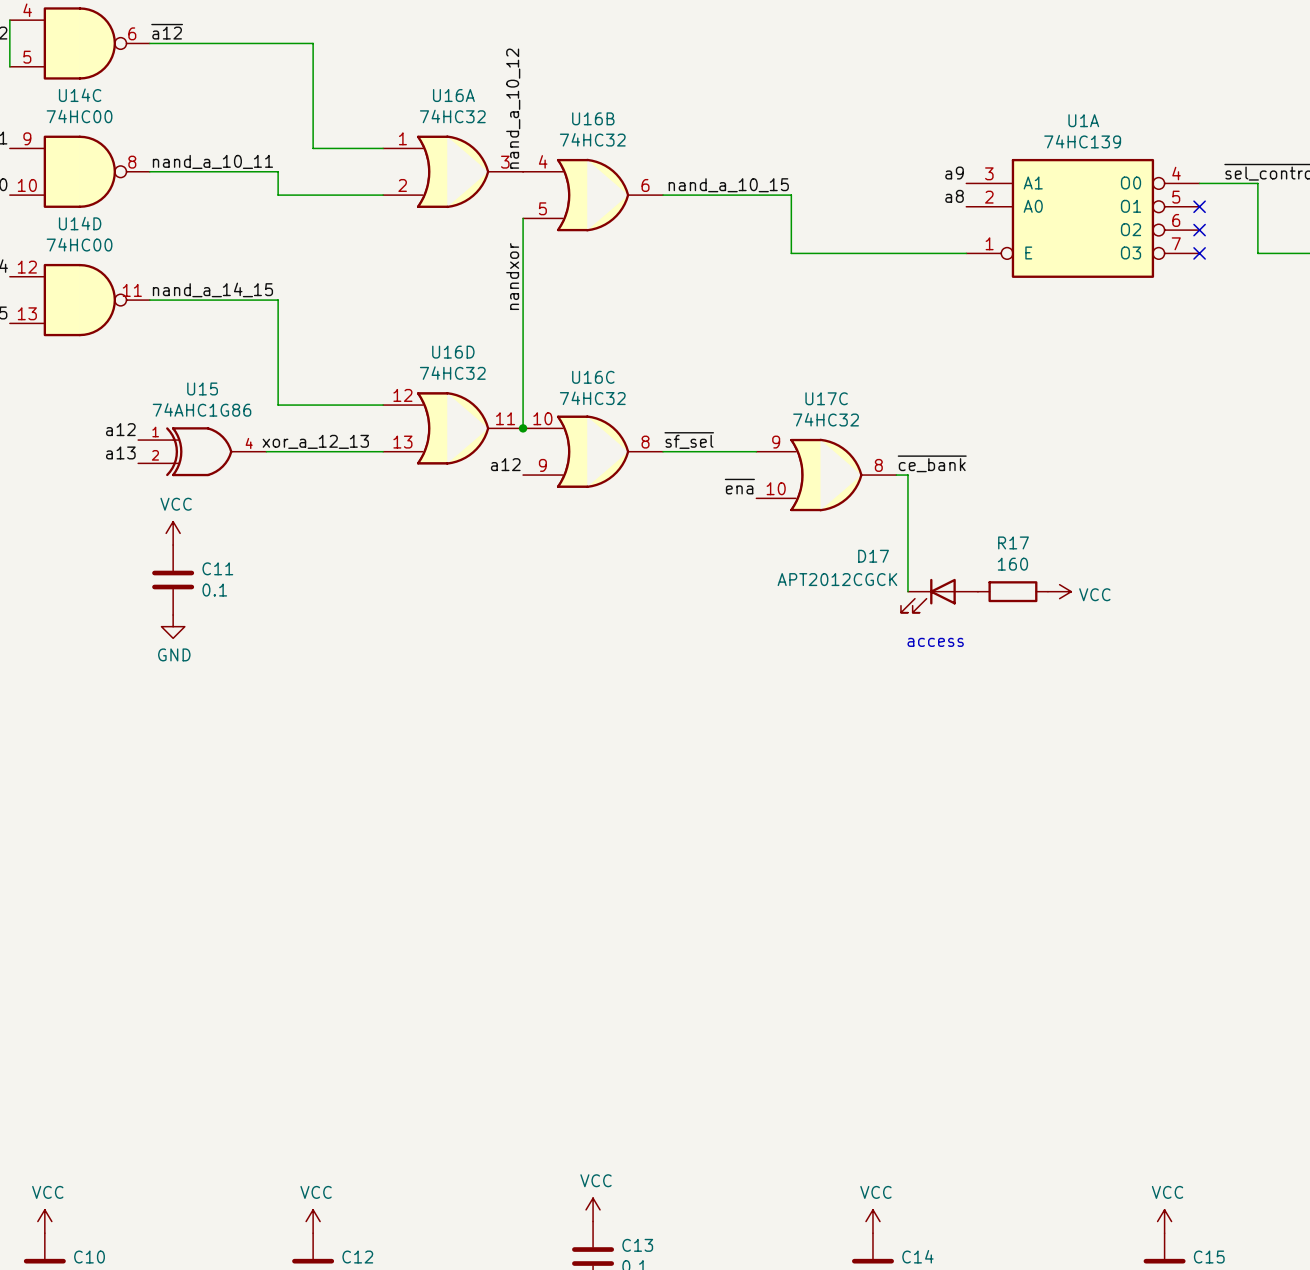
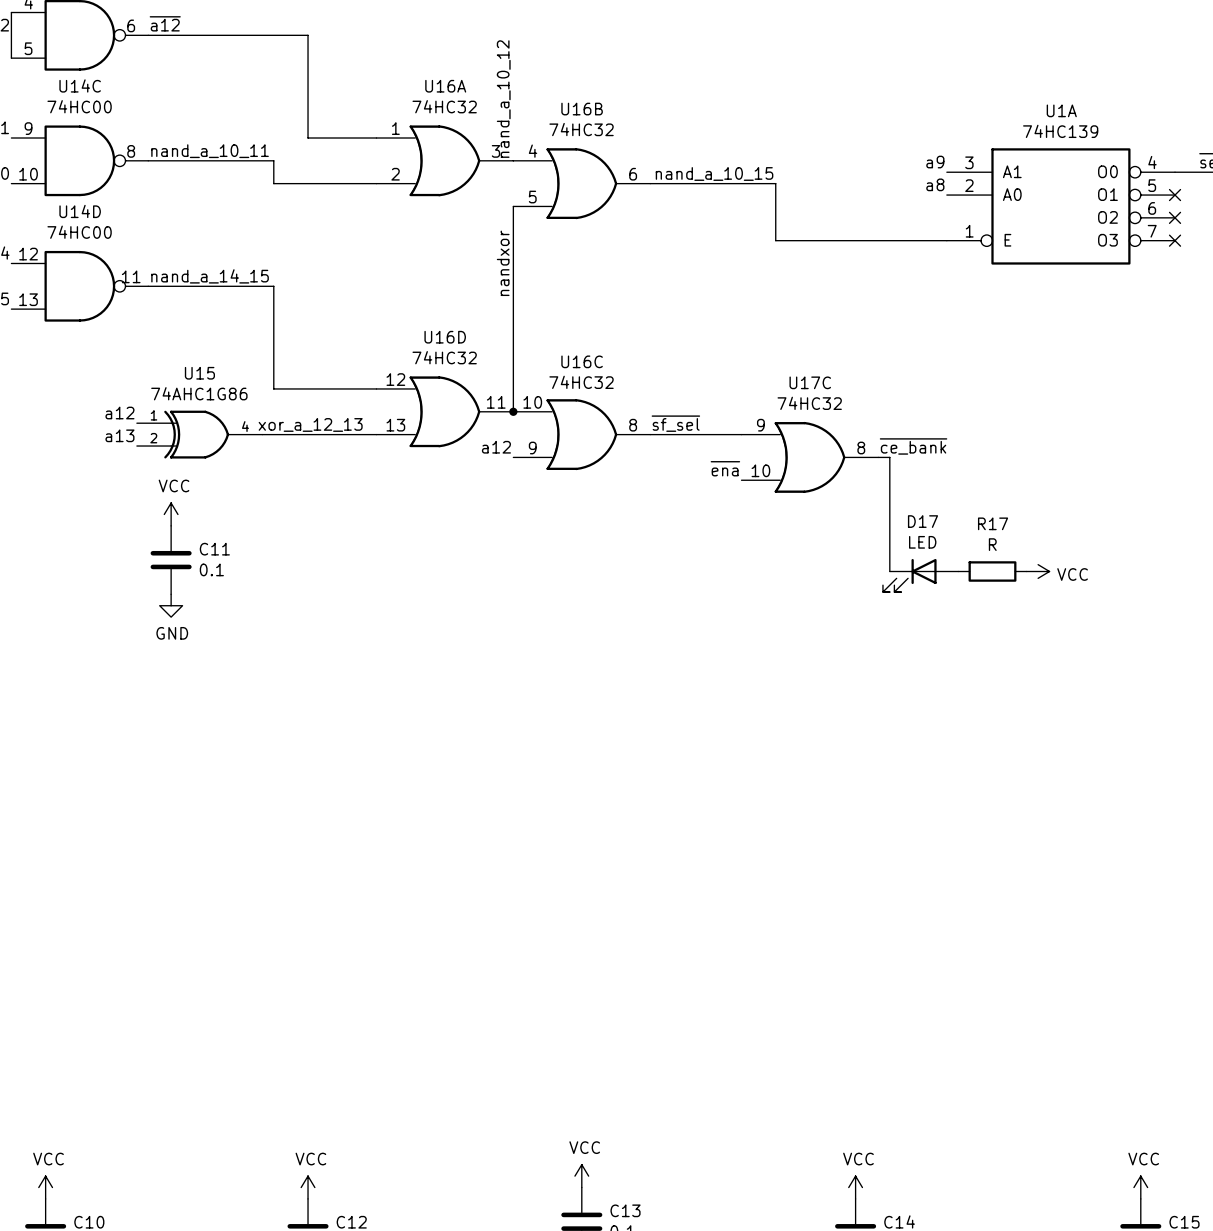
D17 name position: D17 (873, 556) -> D17 (922, 521)
R17 value: 160 (1012, 564) -> R (992, 544)
D17 value: APT2012CGCK (837, 579) -> LED (922, 542)
text: access (935, 642) -> none

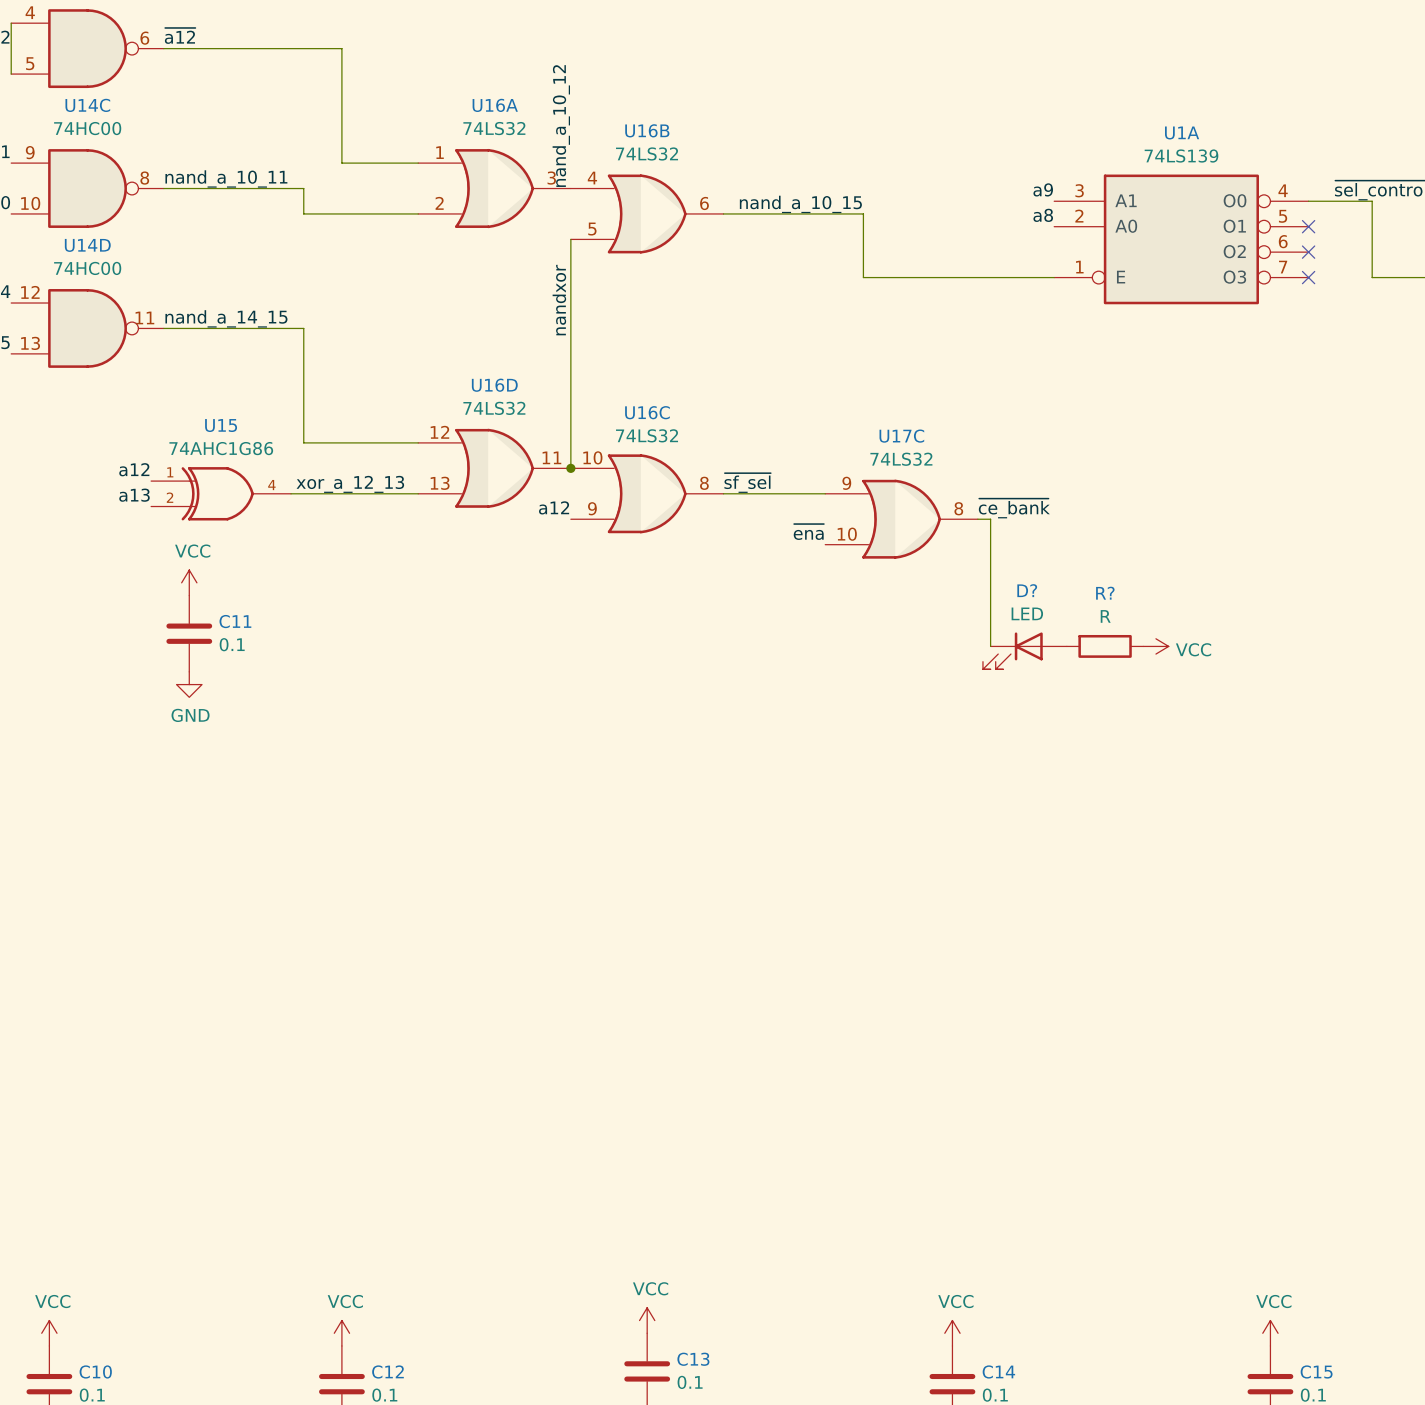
U16A value: 74HC32 (444, 106) -> 74LS32 (494, 128)
U16B value: 74HC32 (581, 129) -> 74LS32 (647, 153)
U1A value: 74HC139 (1060, 131) -> 74LS139 (1181, 156)
U16D value: 74HC32 (444, 357) -> 74LS32 (494, 408)
U16C value: 74HC32 (581, 382) -> 74LS32 (647, 435)
U17C value: 74HC32 (809, 403) -> 74LS32 (901, 459)
D17 name: D17 (922, 521) -> D? (1027, 590)
R17 name: R17 (993, 523) -> R? (1105, 593)

